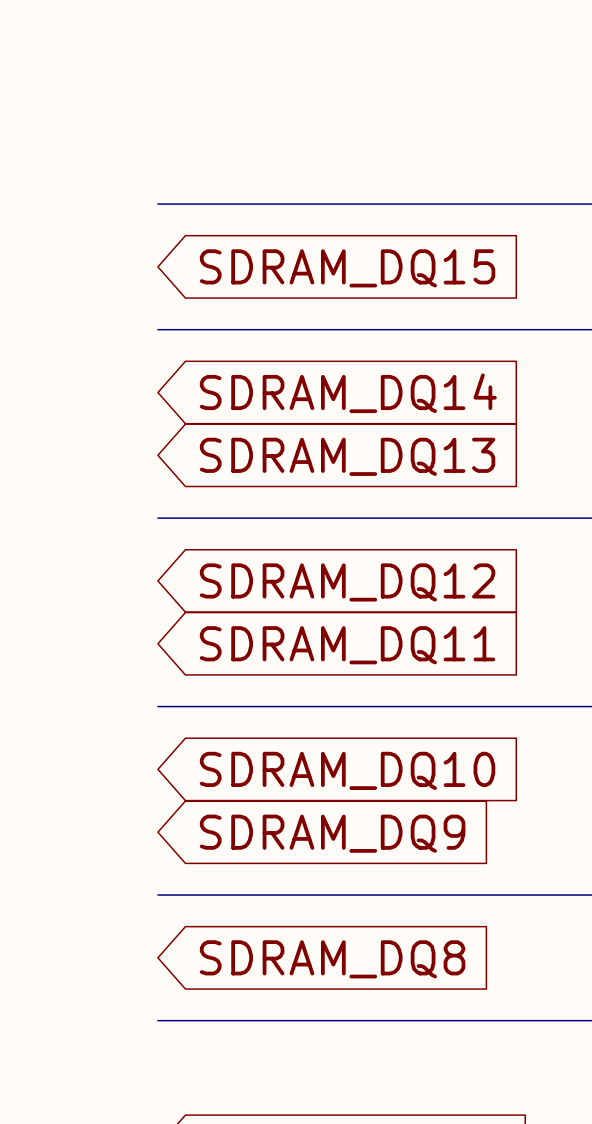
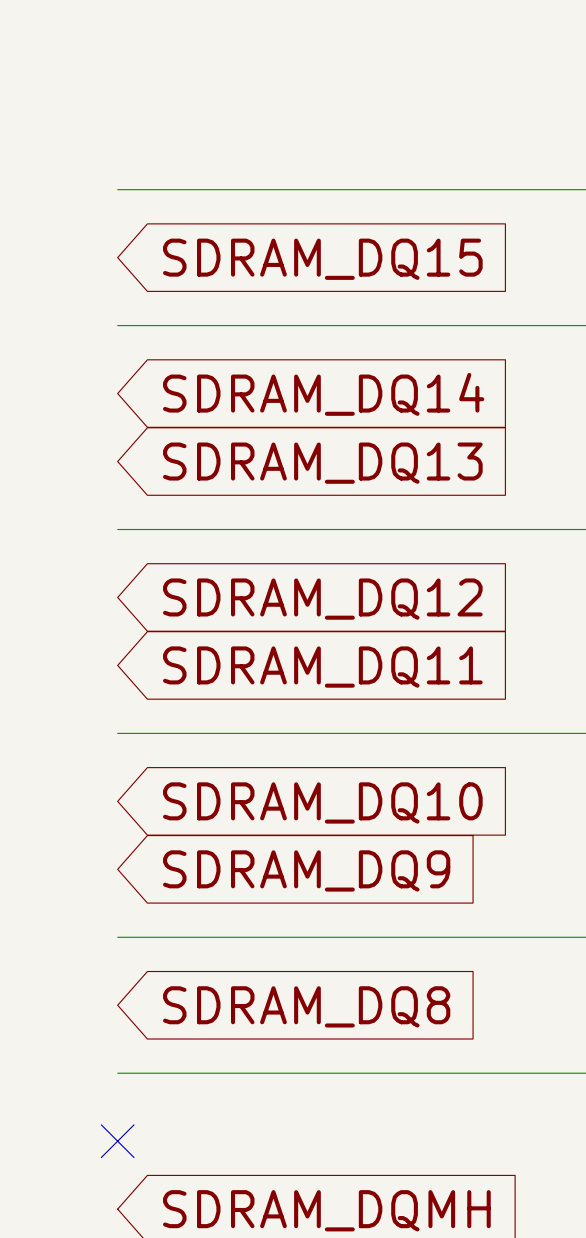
no-connect mark: none -> (117, 1141)

